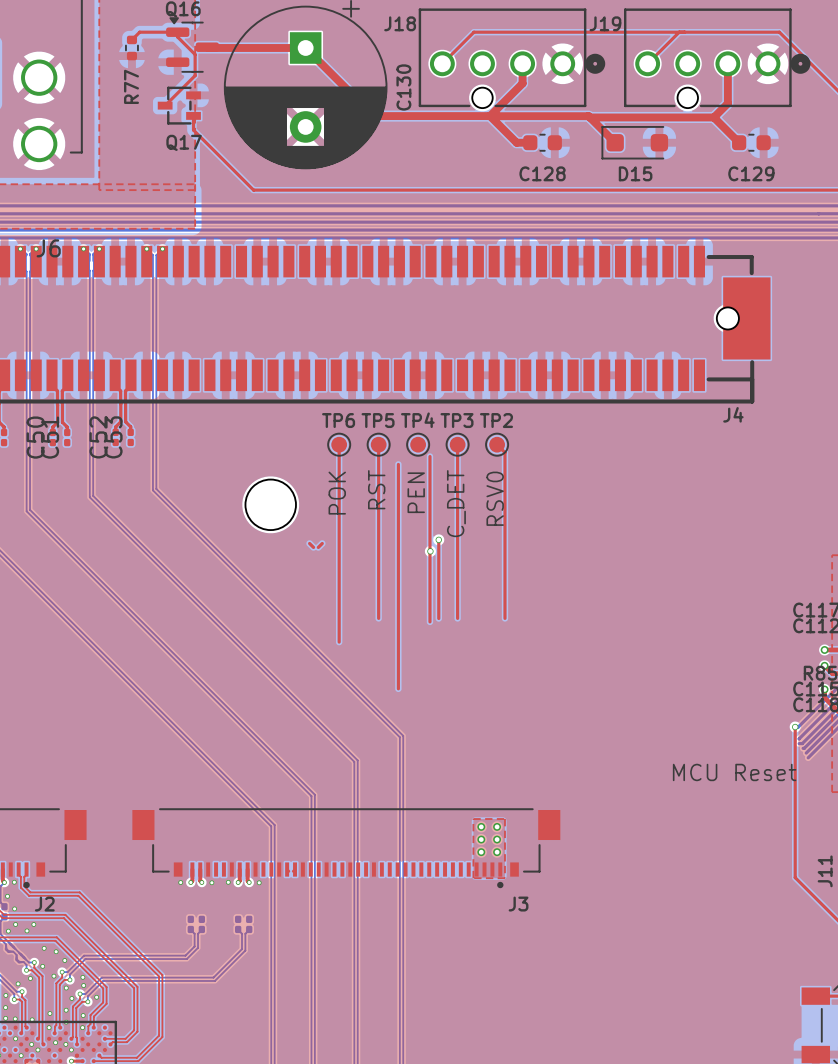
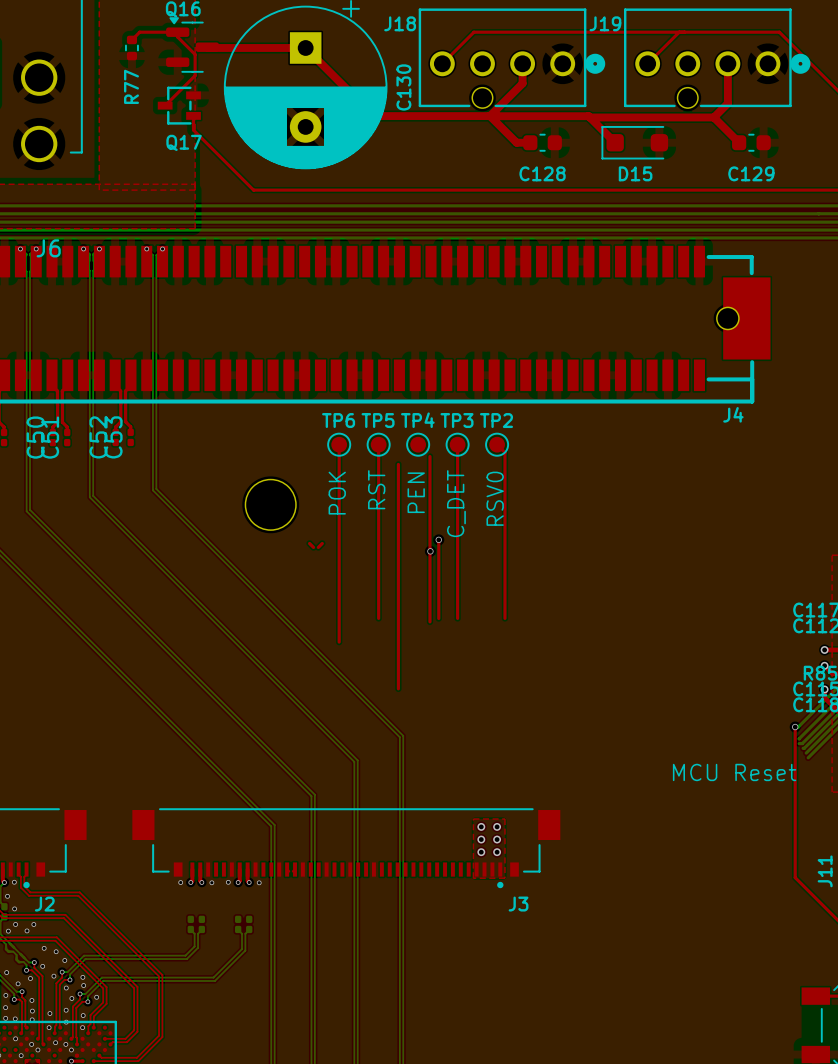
via: none -> (6, 972)
via: none -> (31, 1000)
via: none -> (32, 1011)

